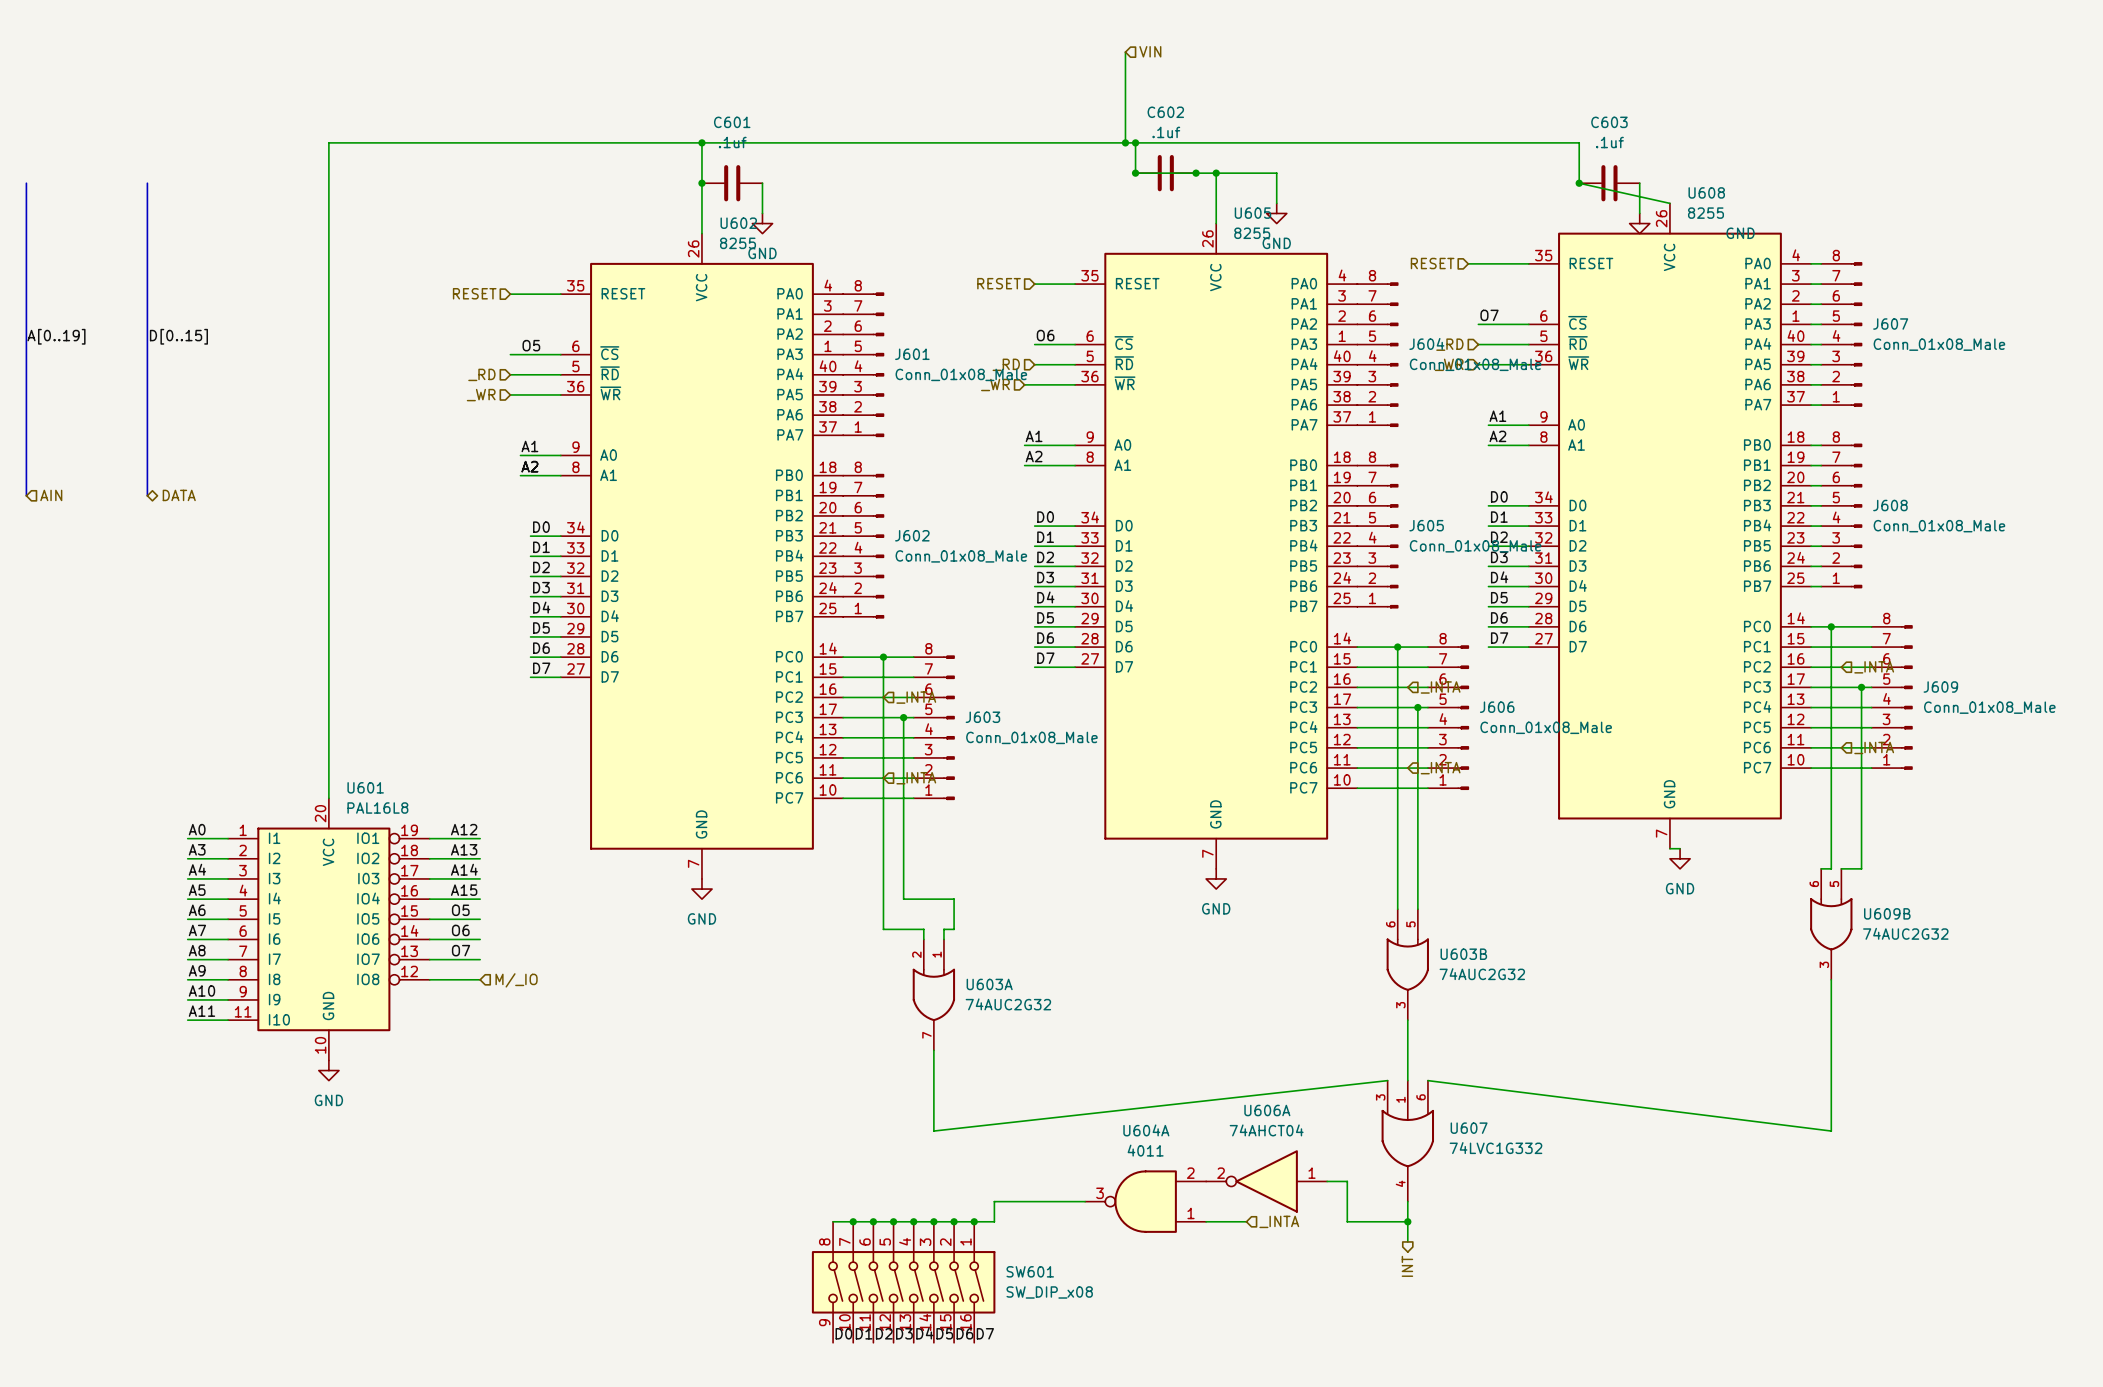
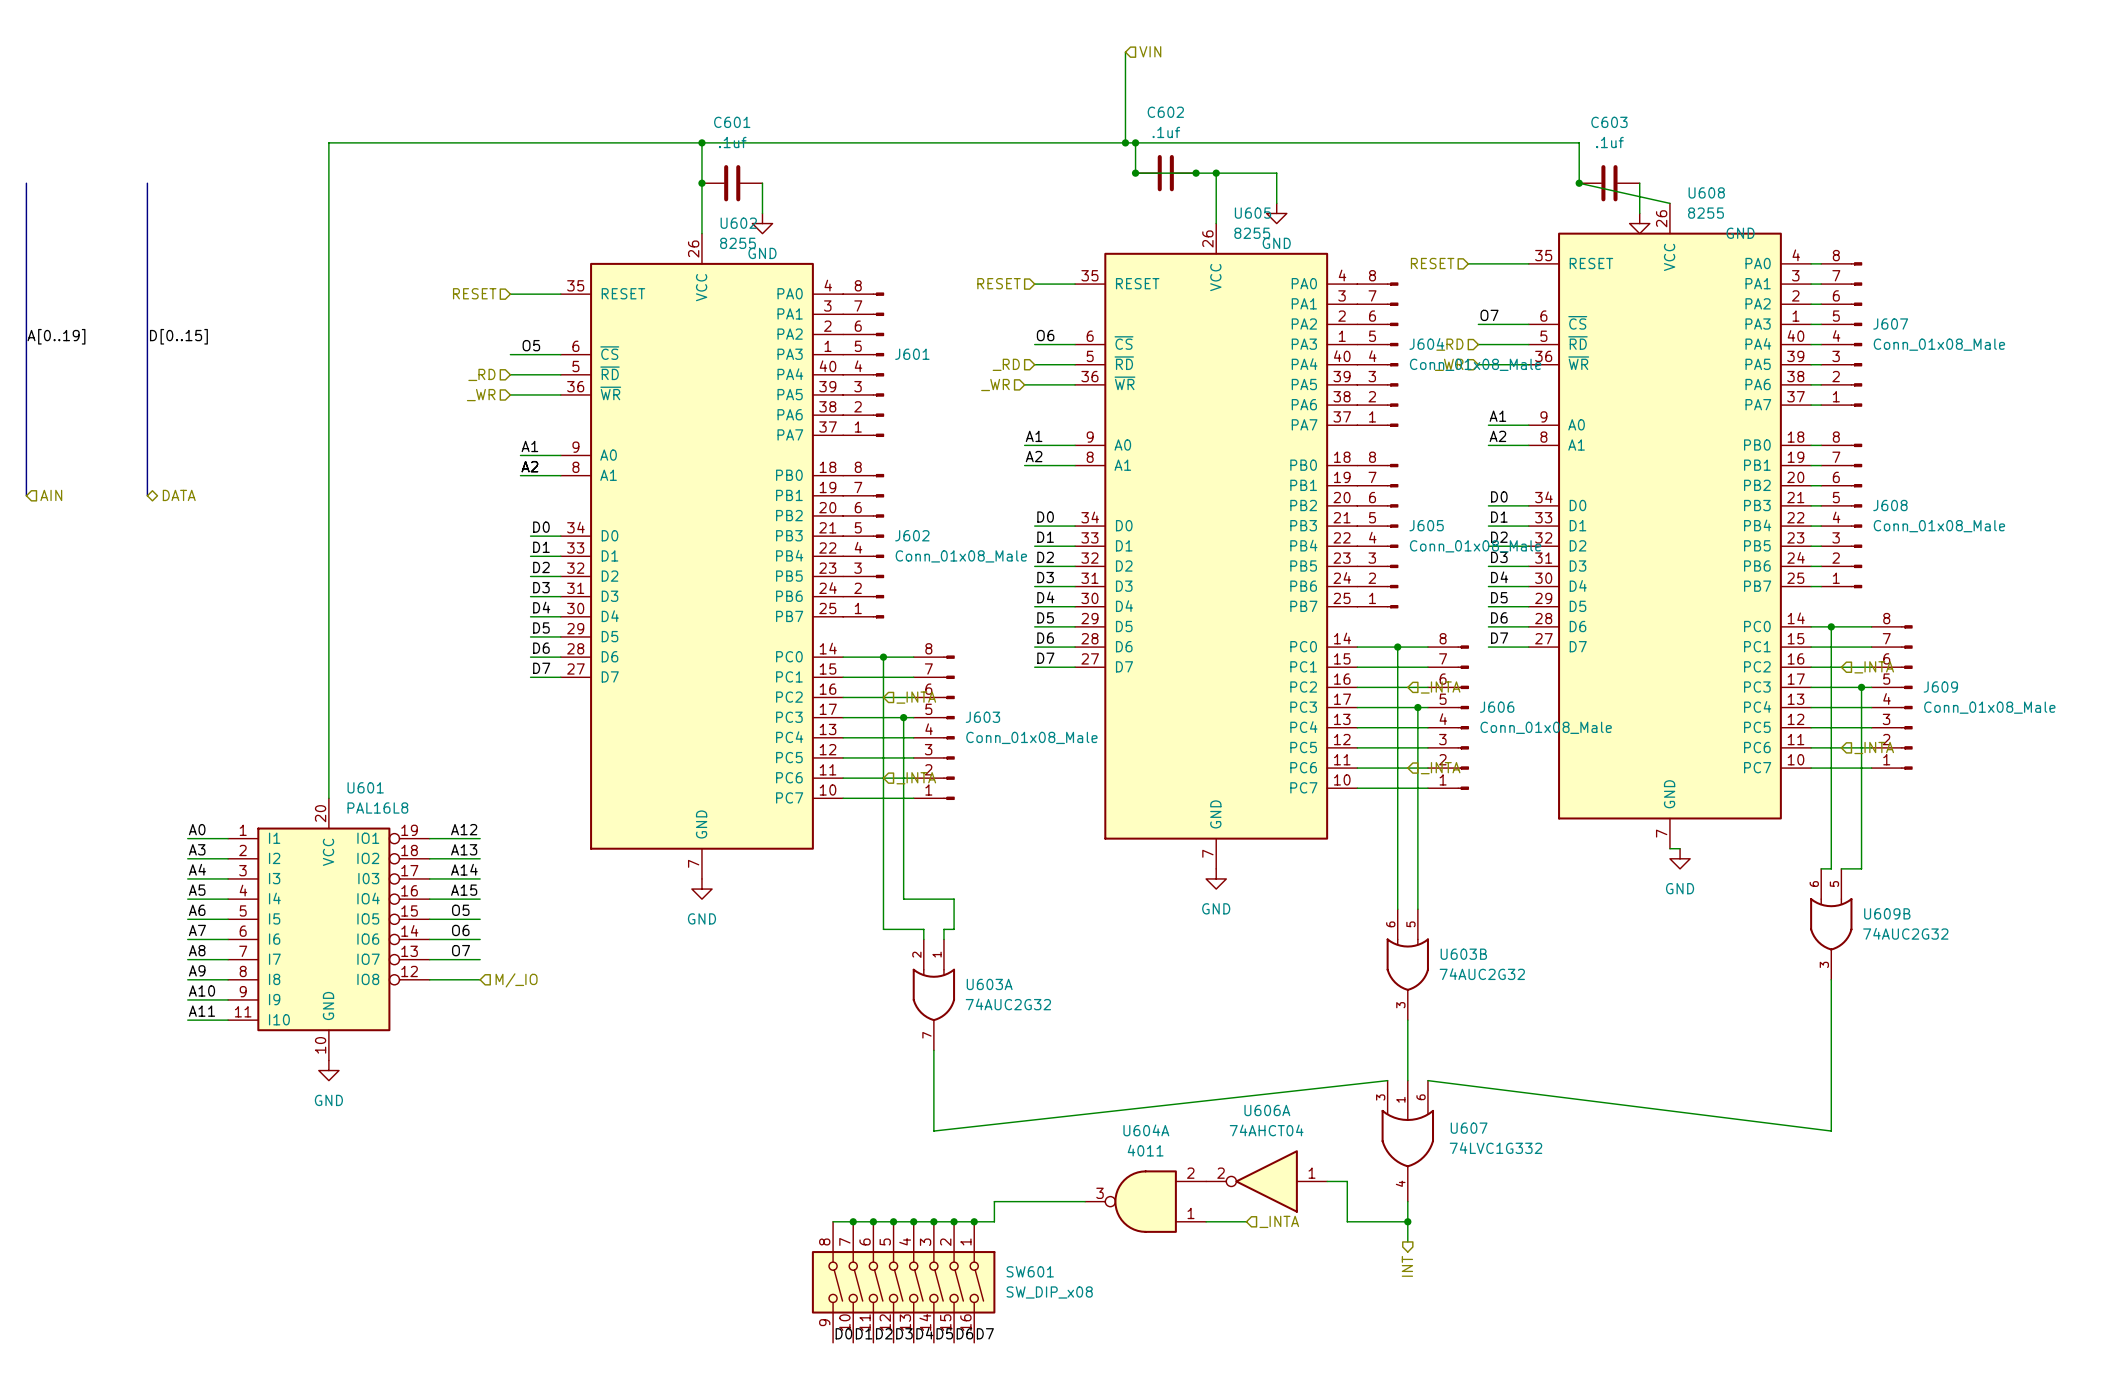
J601 value: Conn_01x08_Male (961, 374) -> none

